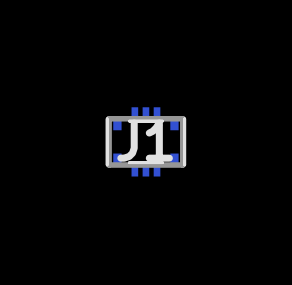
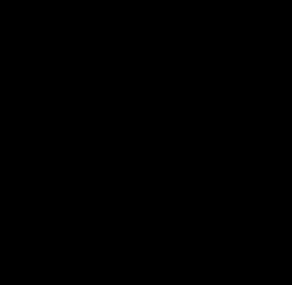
J1: (145, 141) -> none

